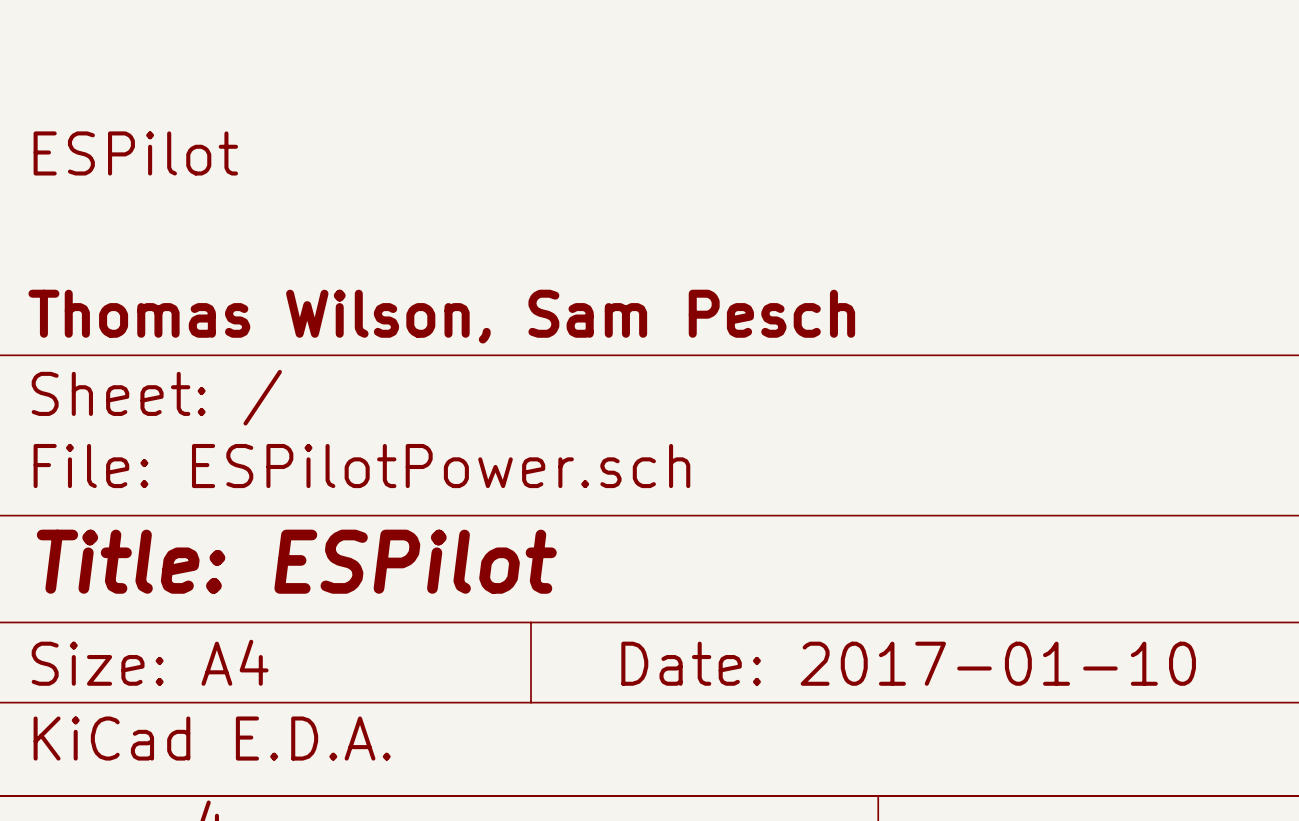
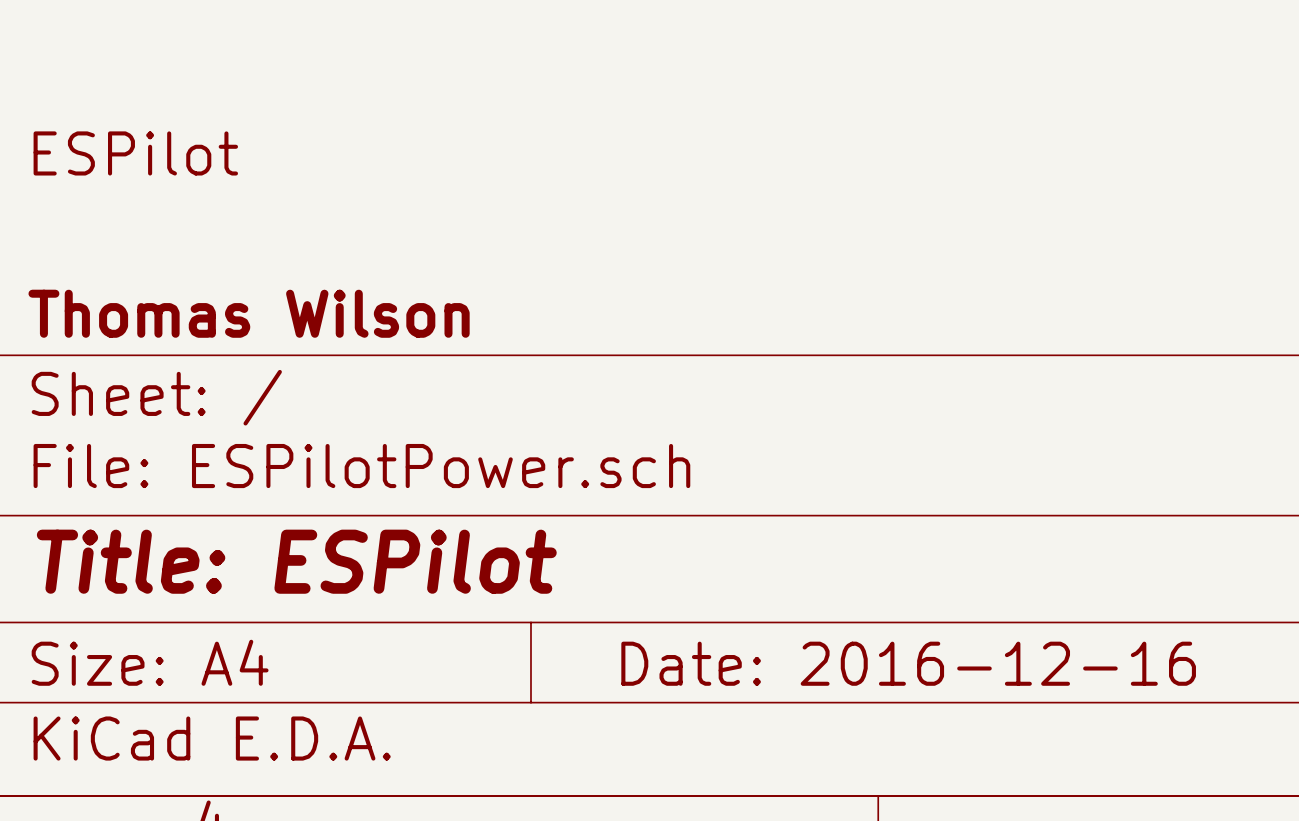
title block: Thomas Wilson, Sam Pesch (441, 316) -> Thomas Wilson (249, 313)
title block: Date: 2017-01-10 (908, 663) -> Date: 2016-12-16 (908, 663)

